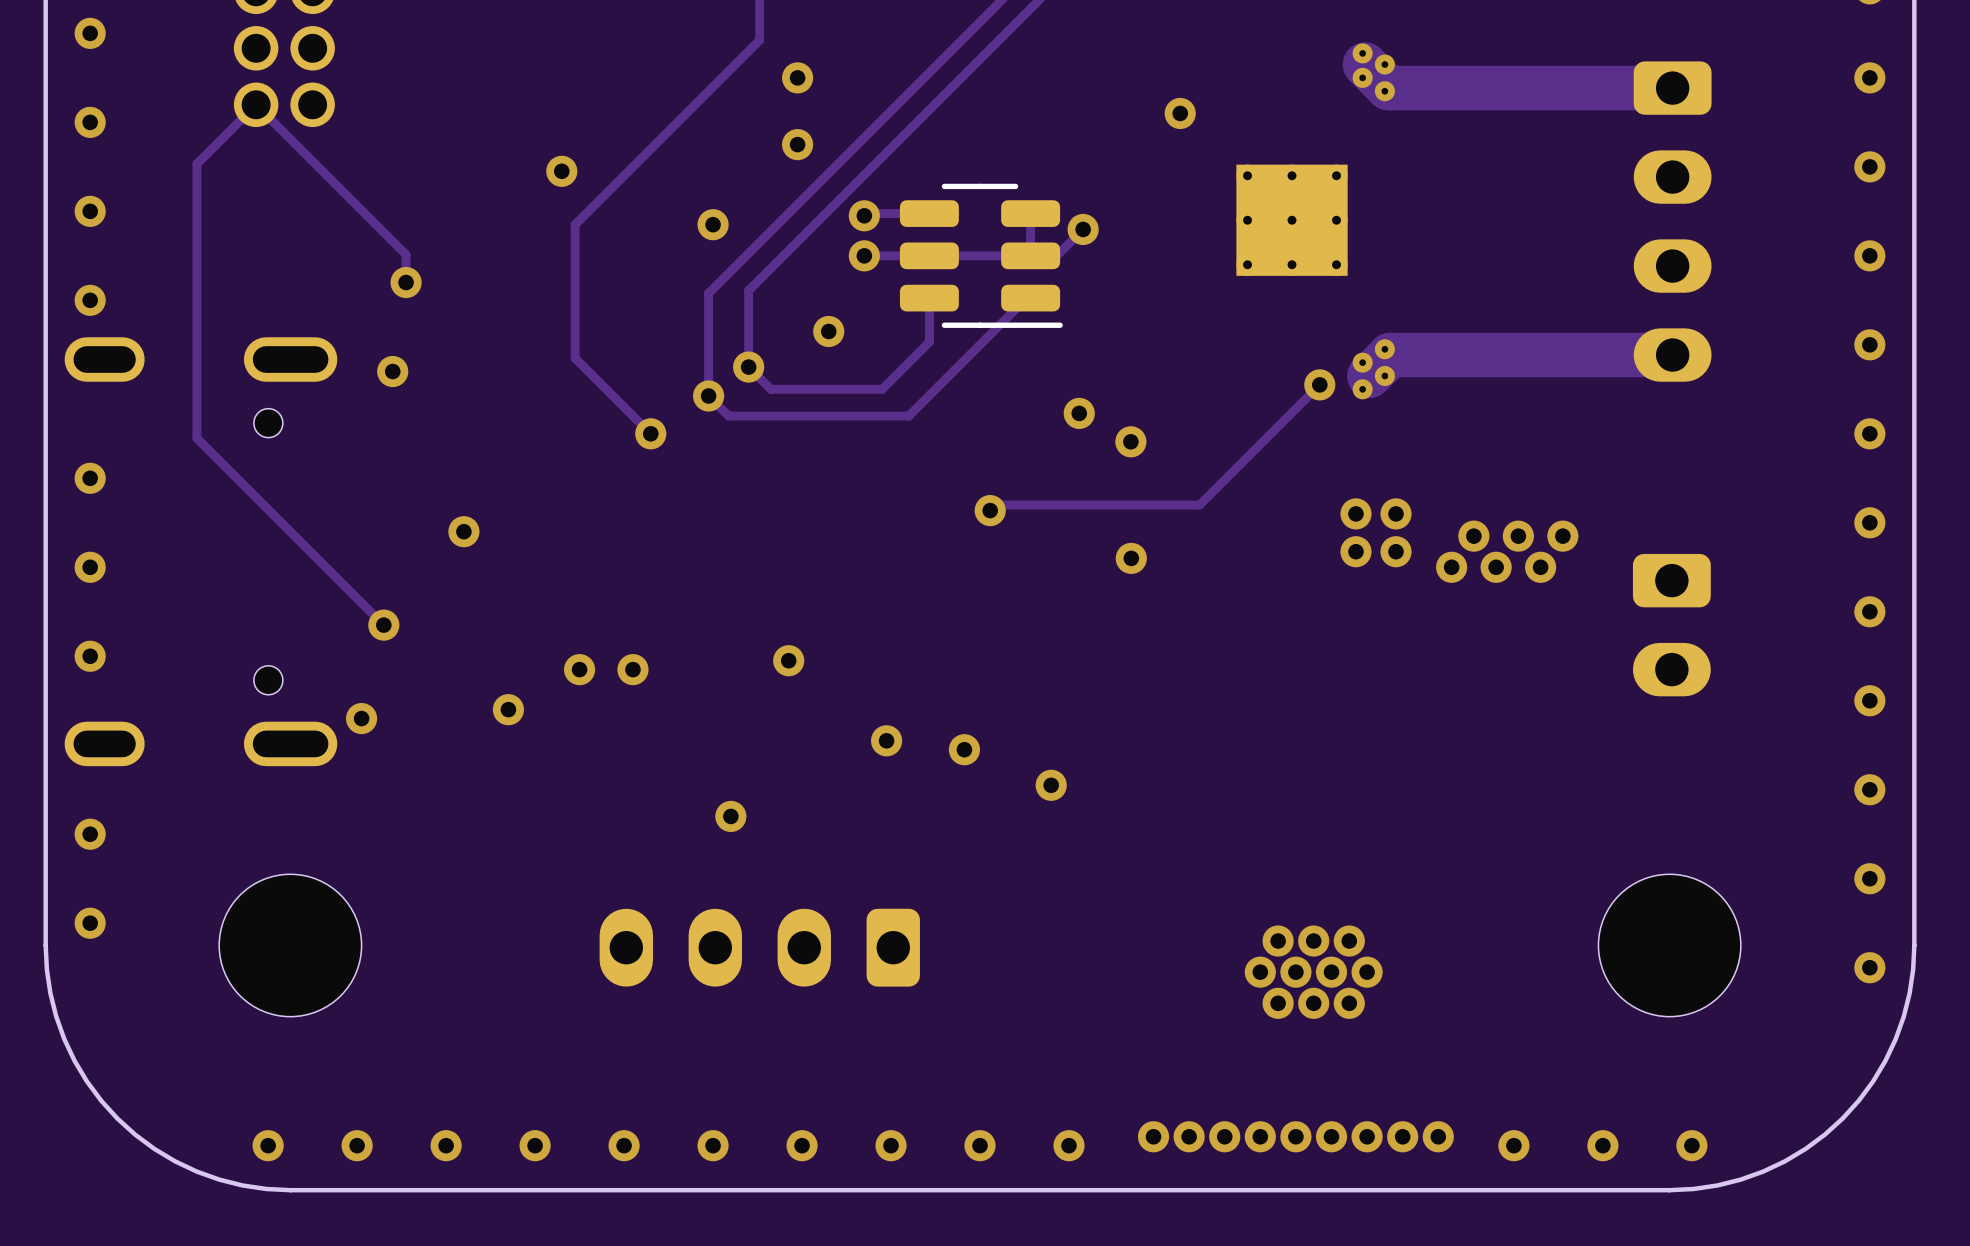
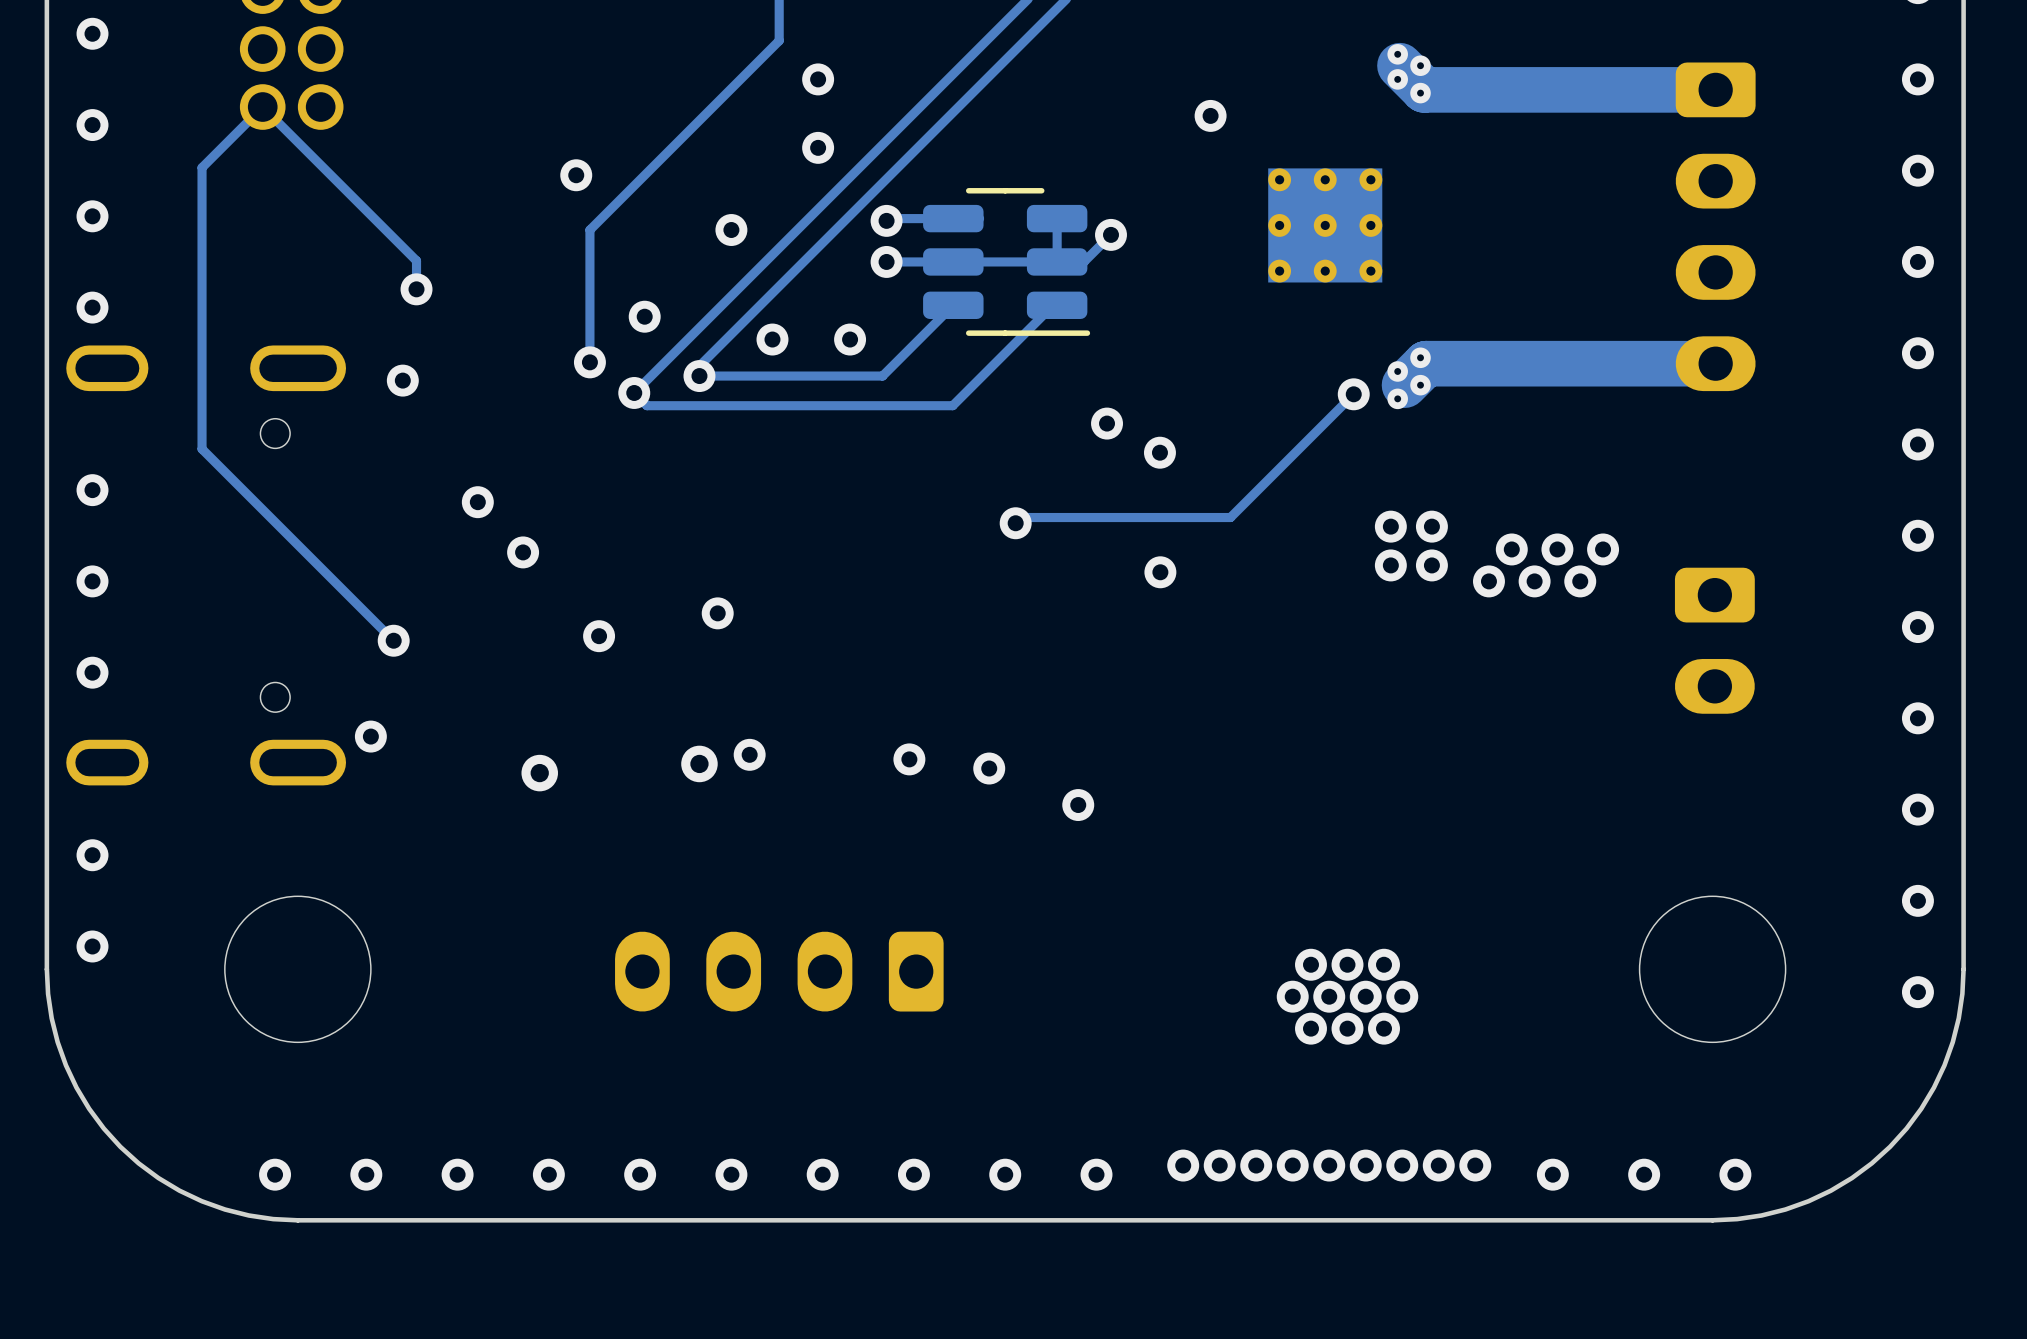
track: (748, 290) (748, 367) (770, 389) (882, 389) (929, 342) (929, 298) -> (767, 297) (699, 366) (699, 376) (882, 376) (953, 305)
track: (708, 293) (708, 395) (728, 416) (908, 416) (928, 395) -> (726, 300) (634, 392) (646, 405) (952, 405)
via: none -> (644, 316)
via: none -> (772, 339)
track: (575, 353) (575, 358) (650, 433) -> none
via: none -> (589, 362)
via: (748, 367) -> none
via: none -> (634, 392)
via position: (708, 395) -> (699, 376)
via: (650, 433) -> none
via: none -> (477, 502)
via: (463, 531) -> none
via: none -> (523, 552)
via: none -> (717, 613)
via: none -> (599, 636)
via: (788, 660) -> none
via: (579, 669) -> none
via: (632, 669) -> none
via: (508, 709) -> none
via: none -> (749, 754)
via: none -> (699, 763)
via: none -> (539, 773)
via: (730, 816) -> none

